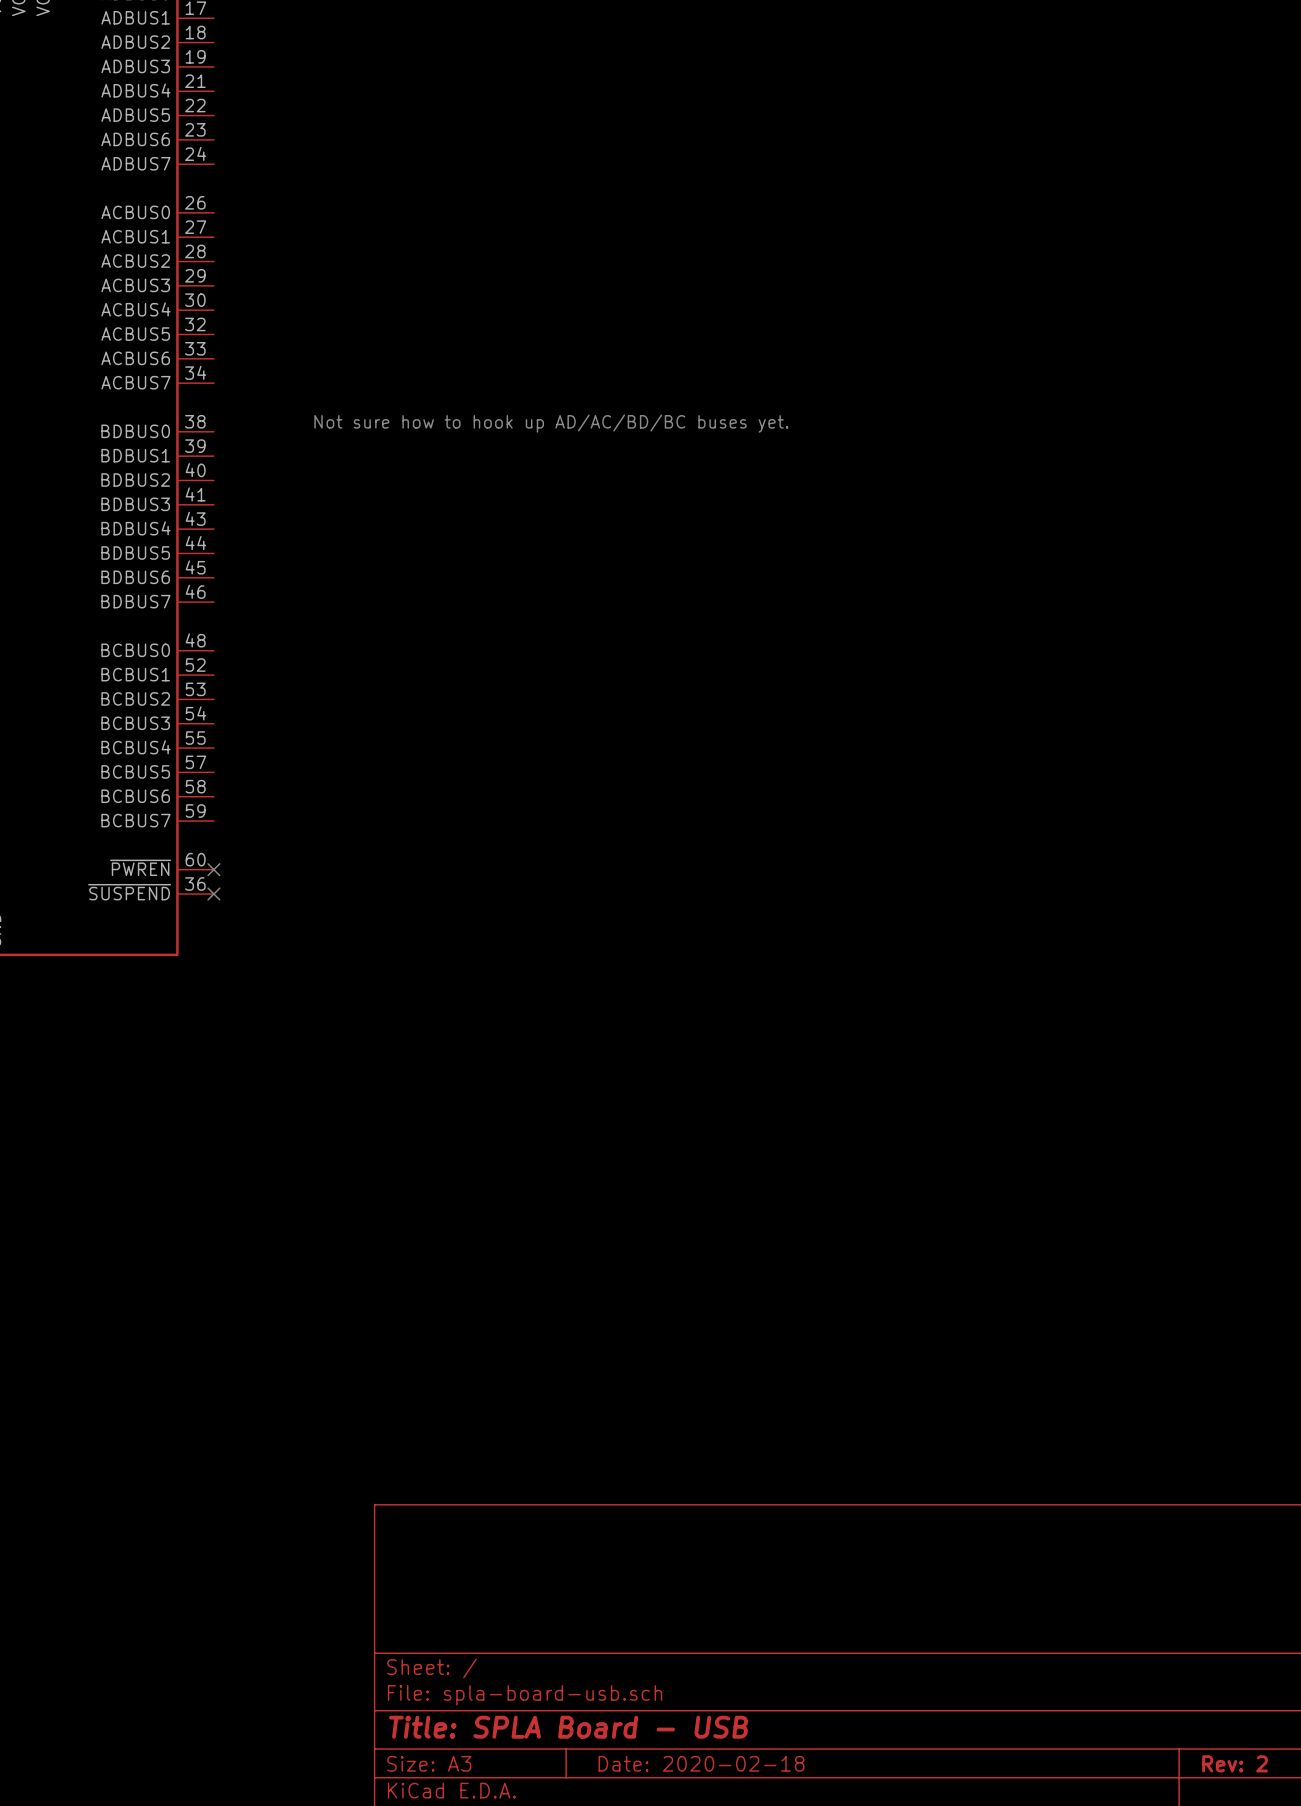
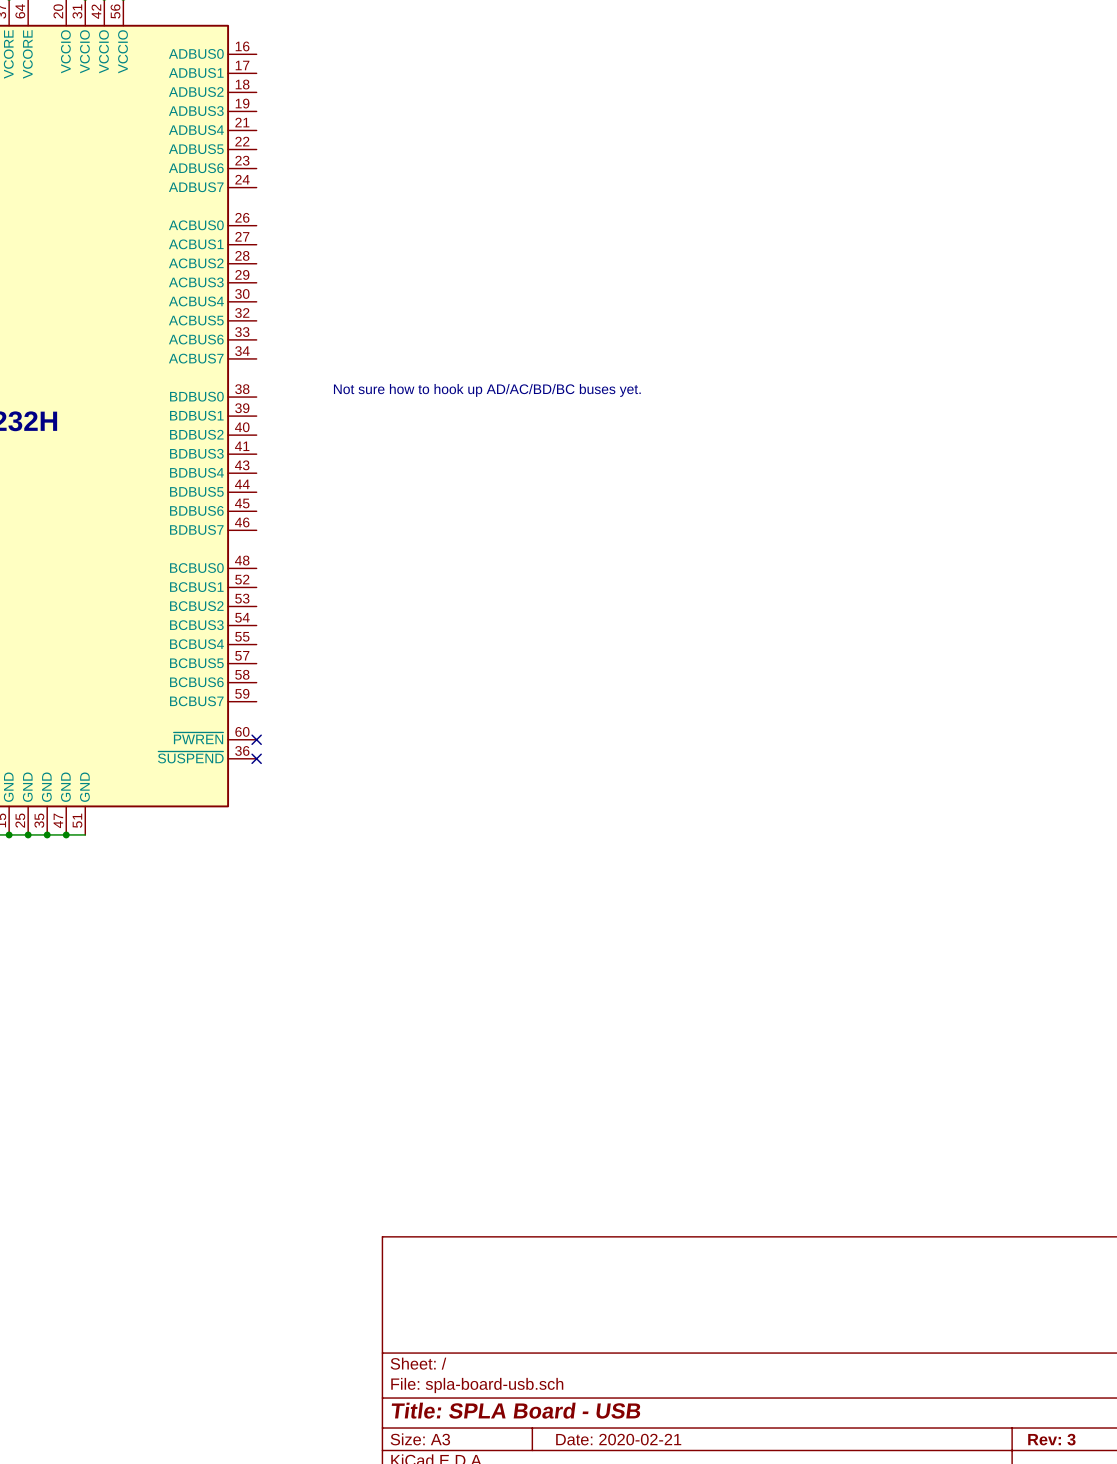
title block: Date: 2020-02-18 (701, 1763) -> Date: 2020-02-21 (618, 1439)
title block: Rev: 2 (1235, 1763) -> Rev: 3 (1051, 1439)

